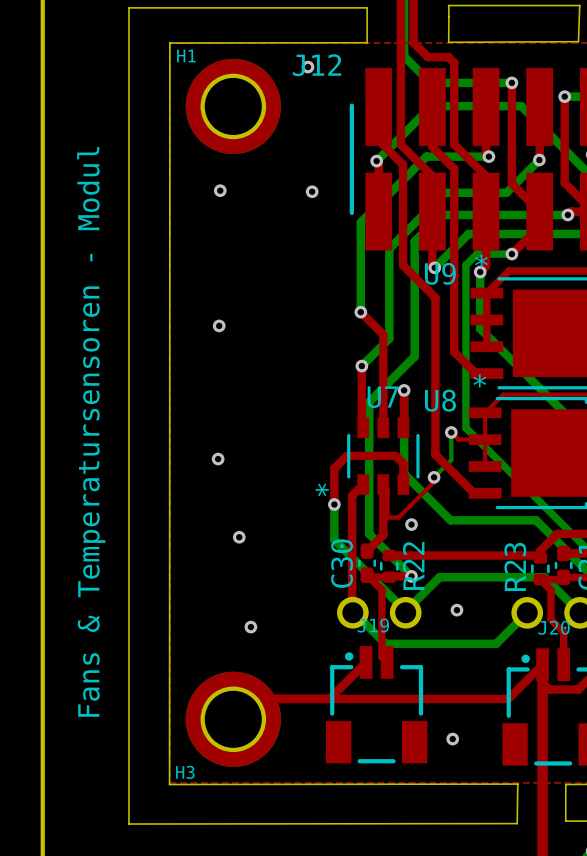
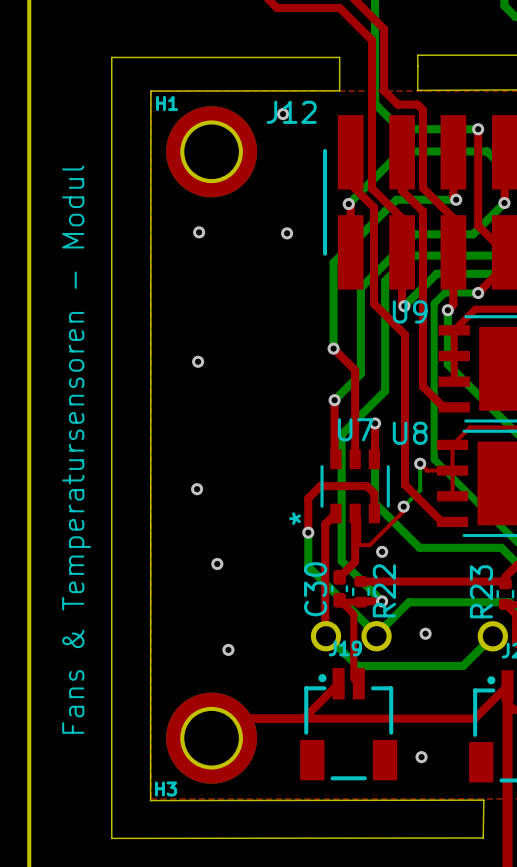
U9 text: * (481, 261) -> none
U8 text: * (479, 380) -> none

